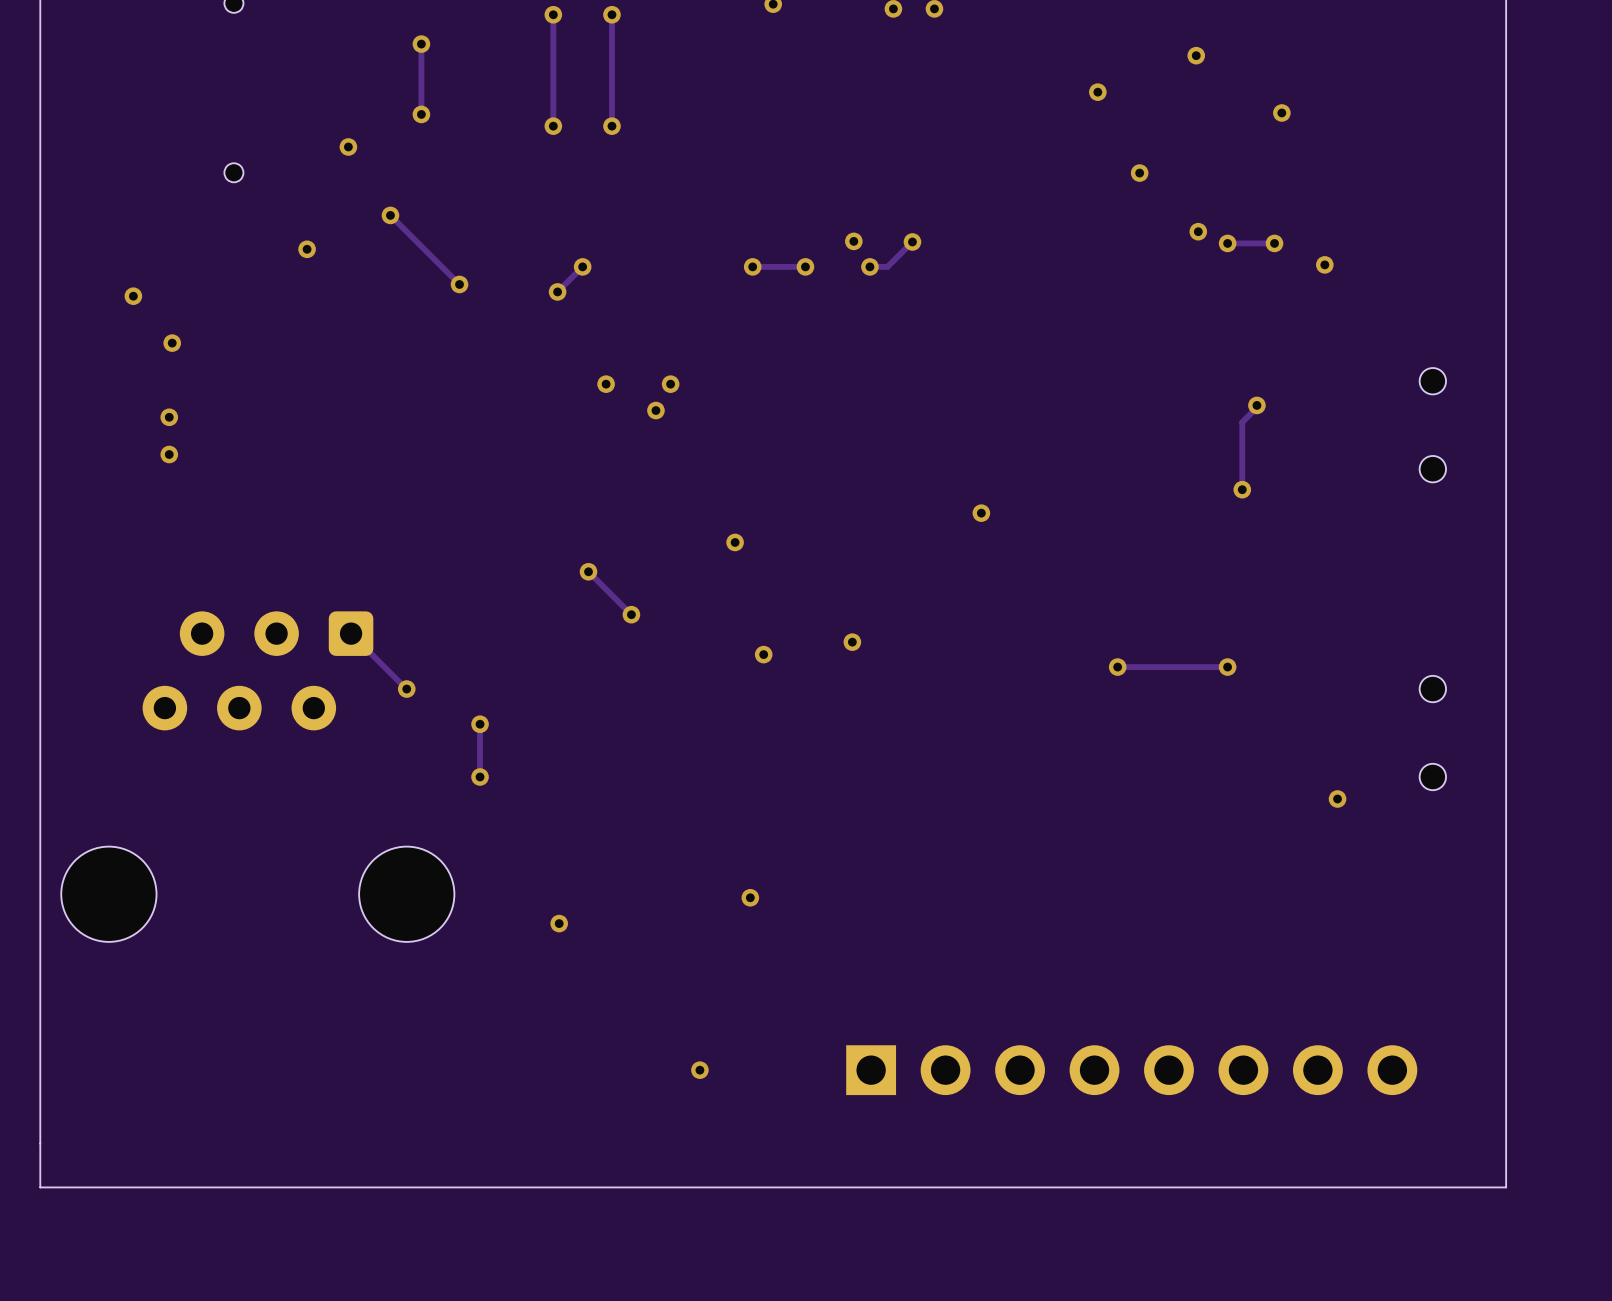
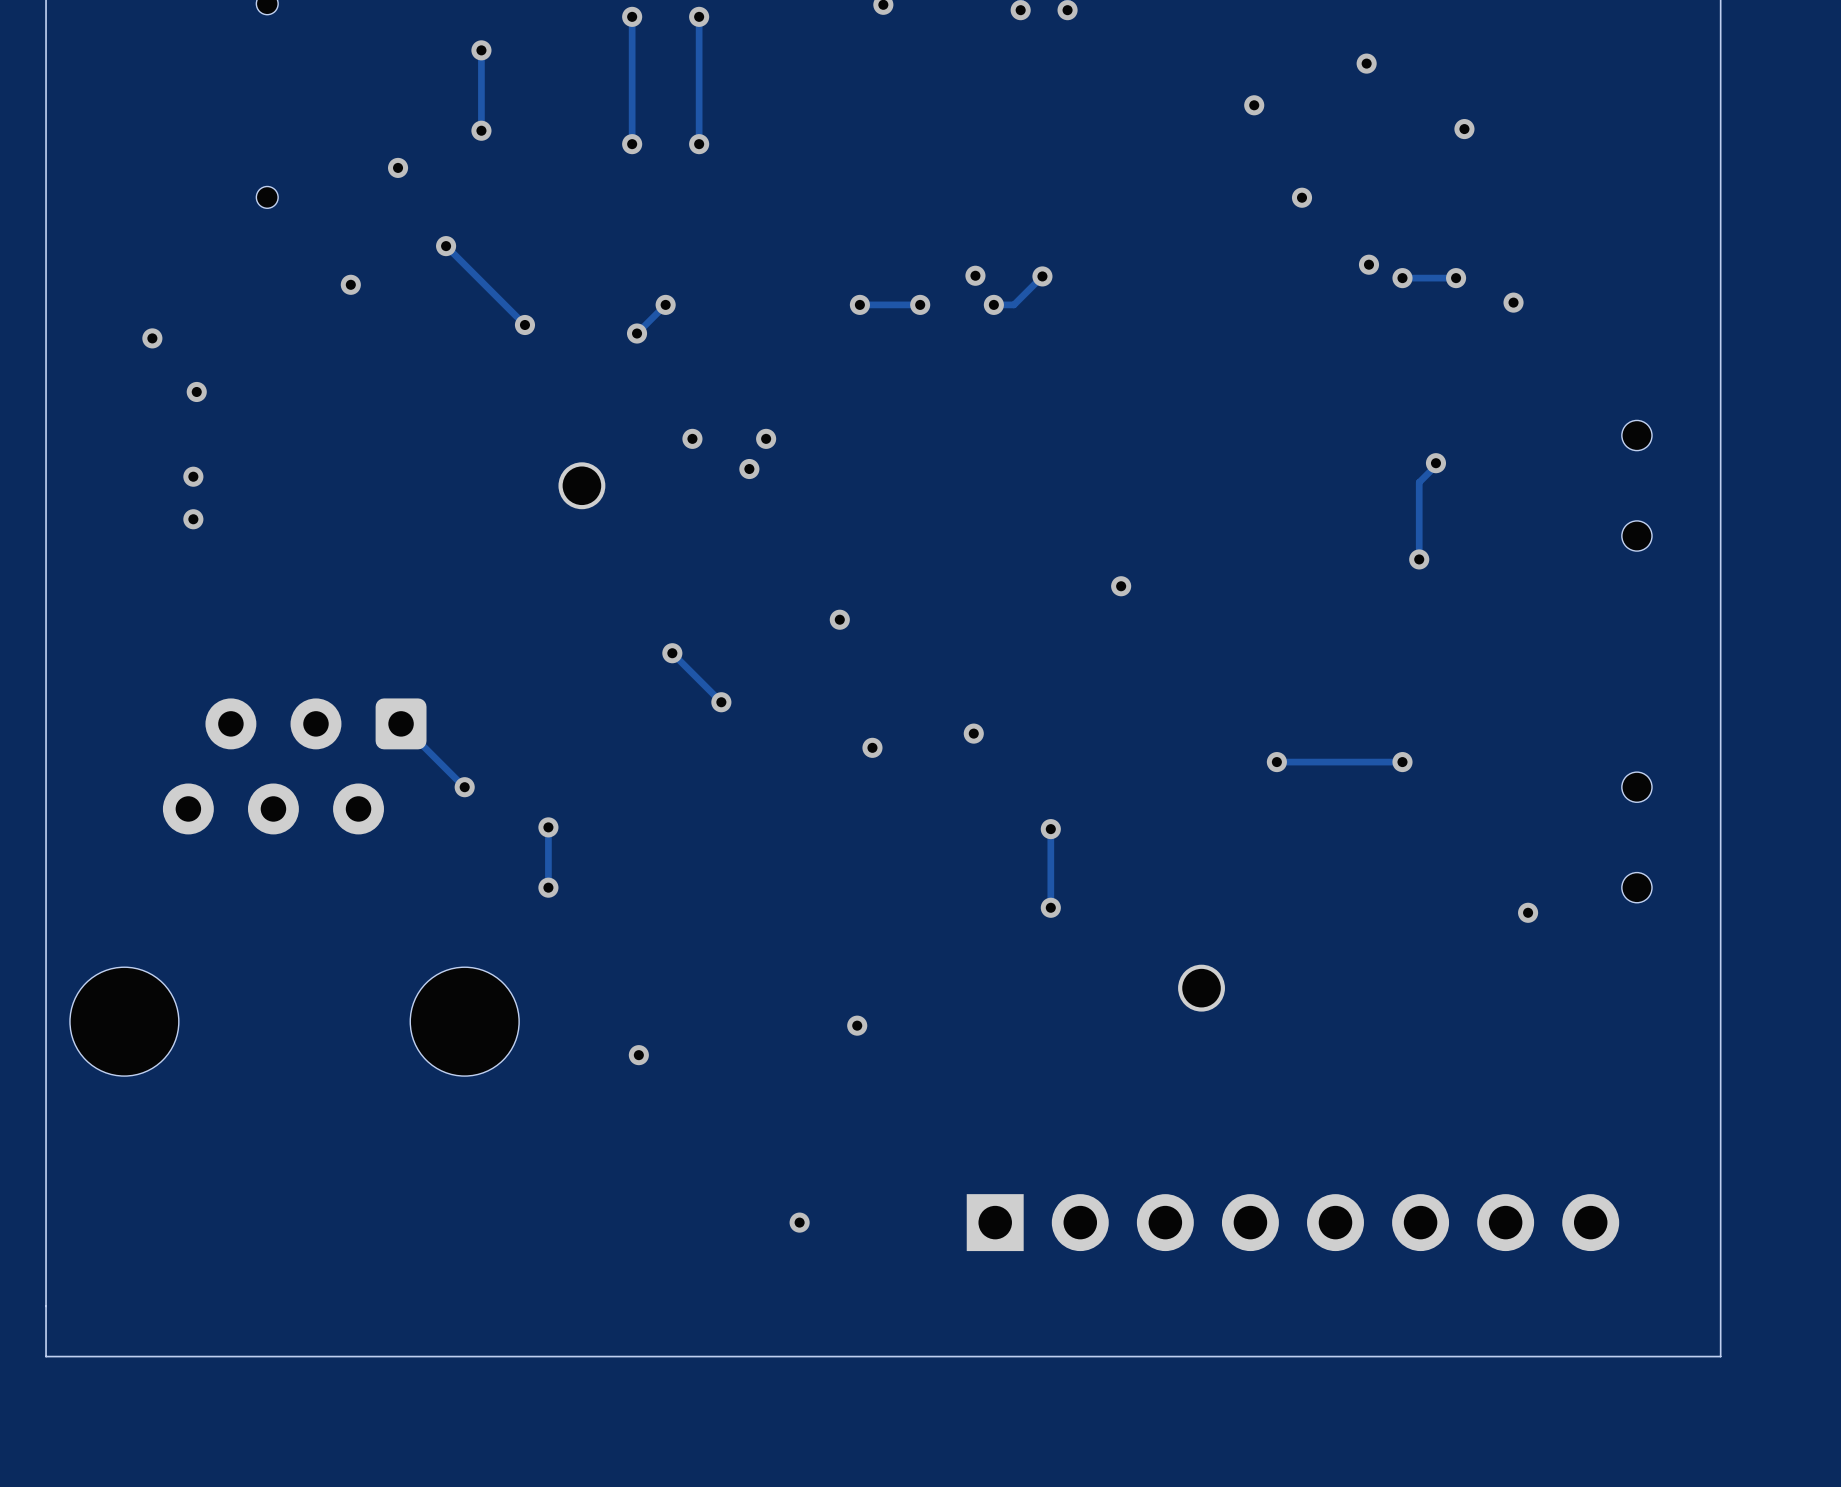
part: none -> (581, 485)
track: none -> (1050, 829) (1050, 907)
via: none -> (1050, 829)
via: none -> (1050, 907)
part: none -> (1201, 988)

